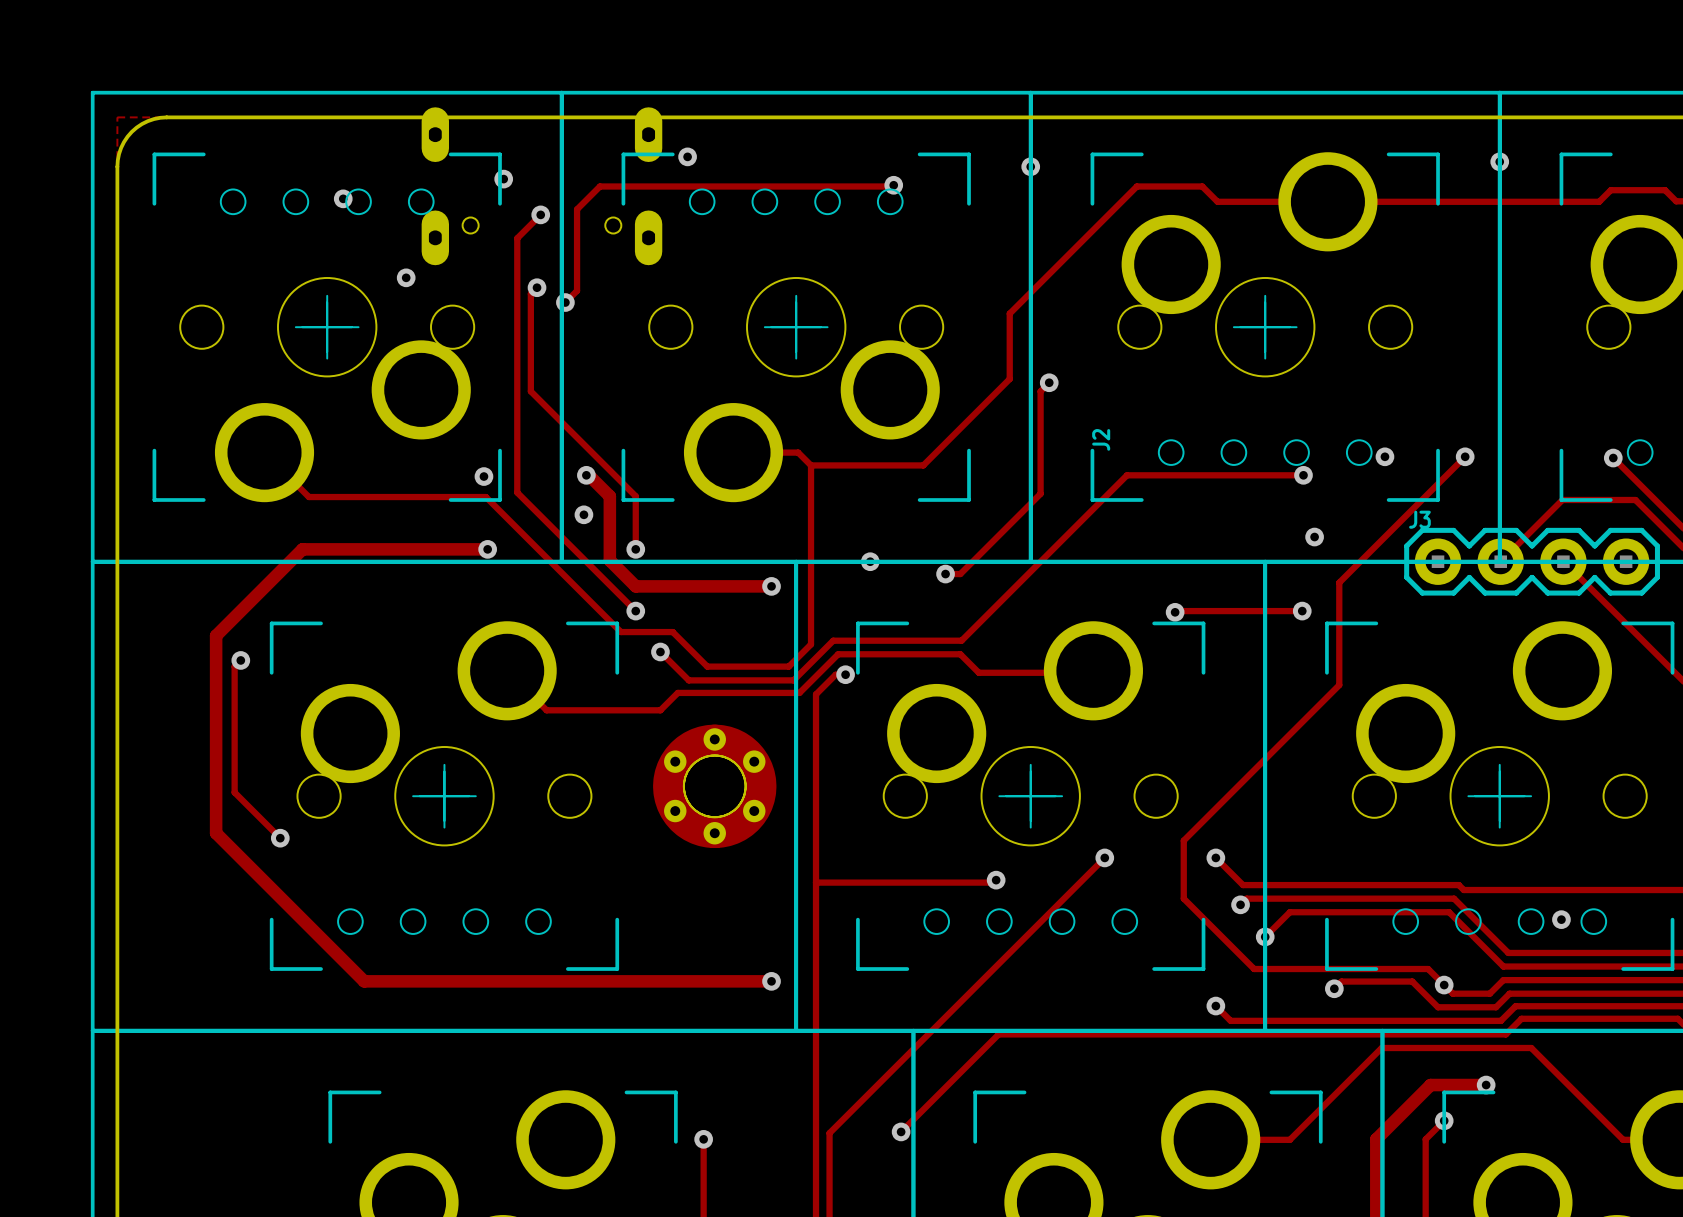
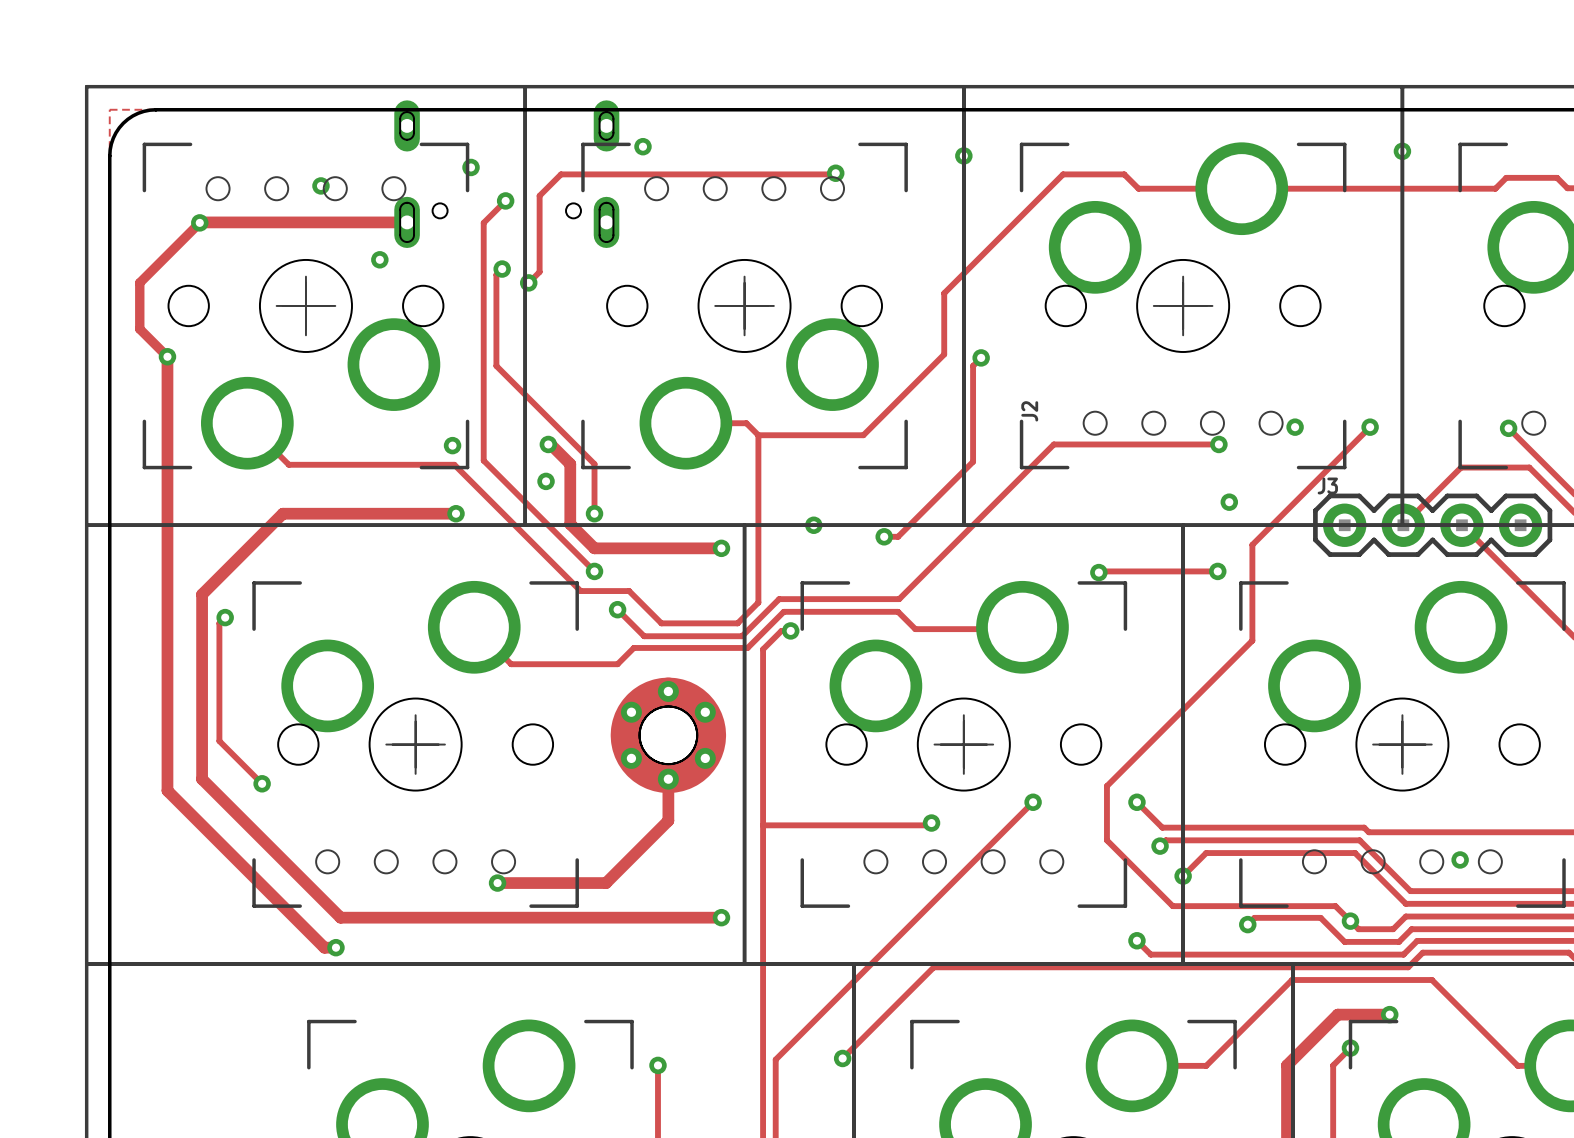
track: none -> (407, 222) (200, 222) (139, 282) (139, 329) (167, 356) (167, 790) (324, 947) (335, 947)
via: none -> (199, 222)
via: none -> (167, 356)
track: none -> (668, 779) (668, 820) (606, 883) (497, 883)
via: none -> (497, 883)
via: none -> (335, 947)

